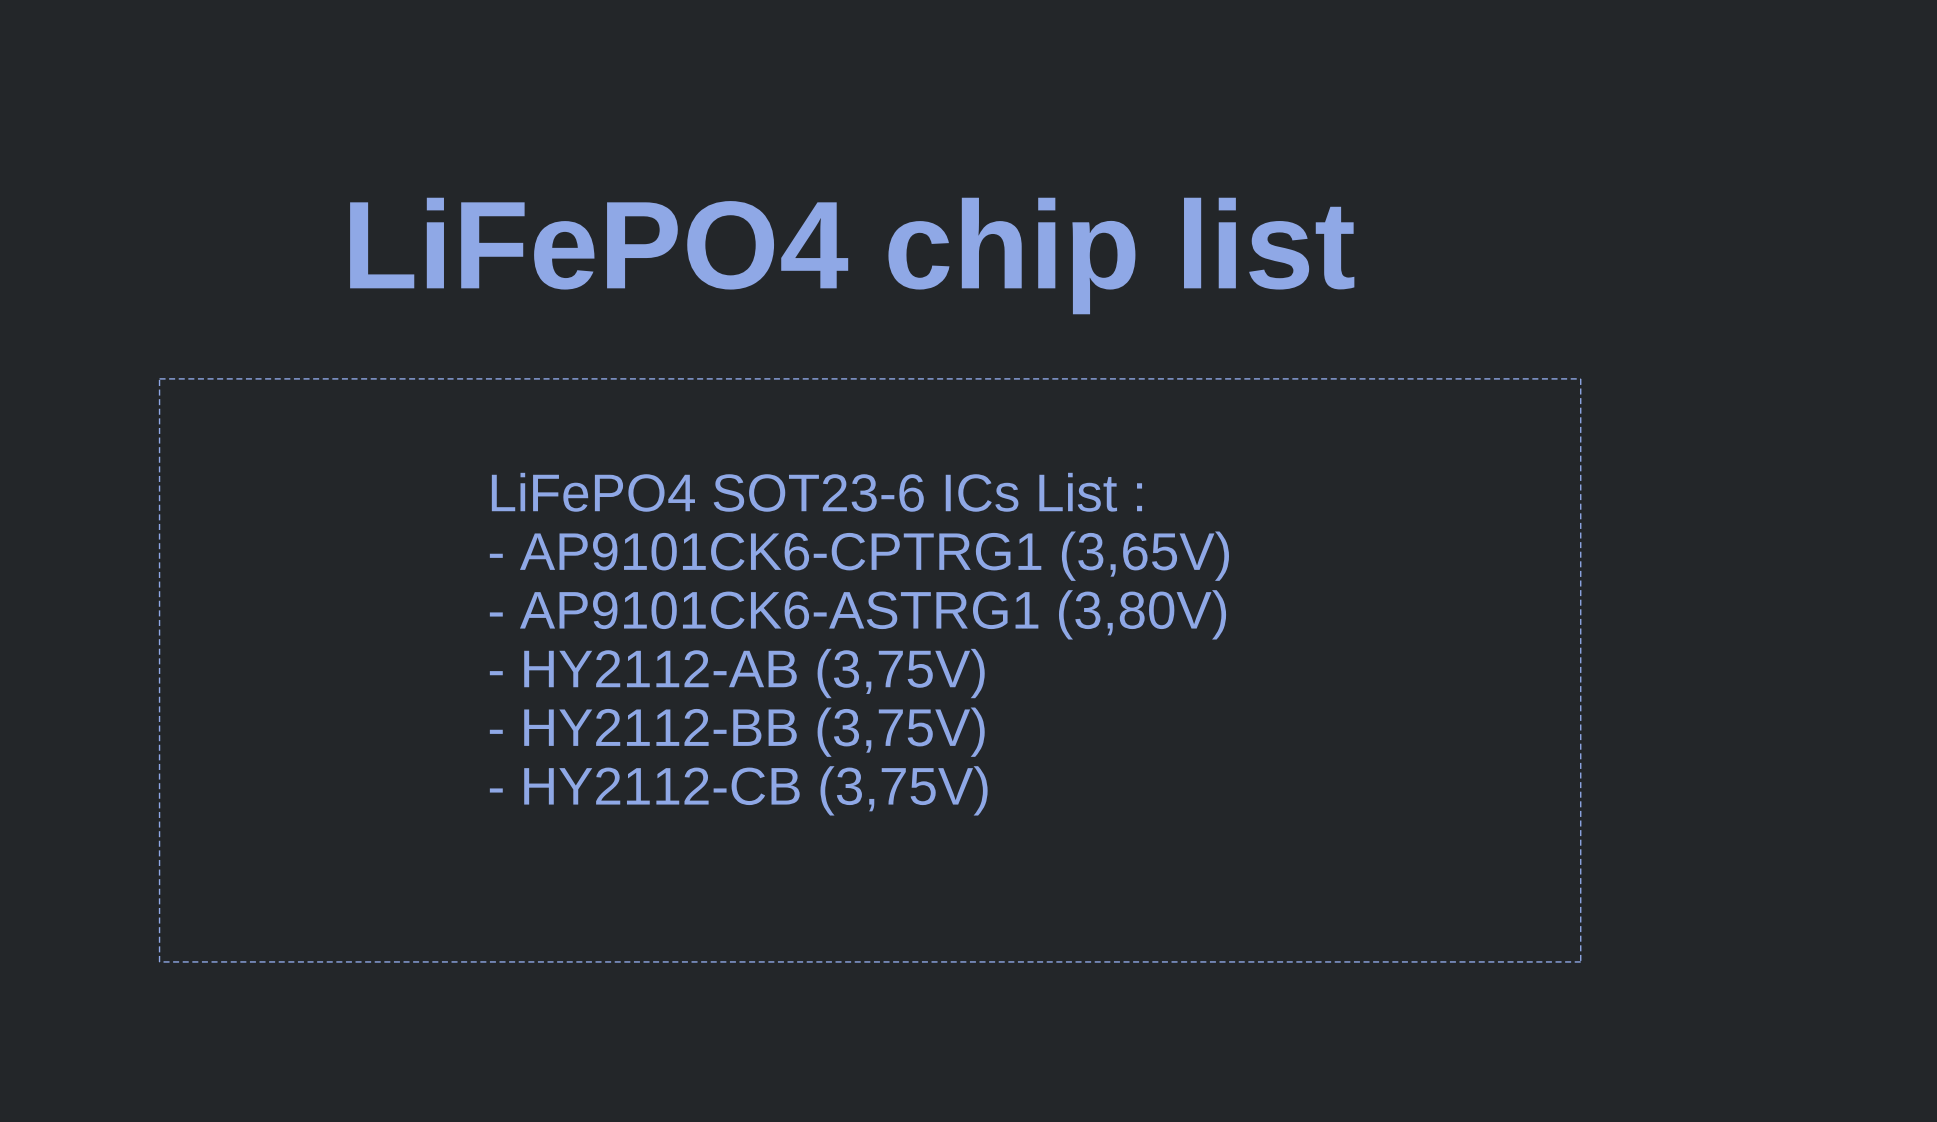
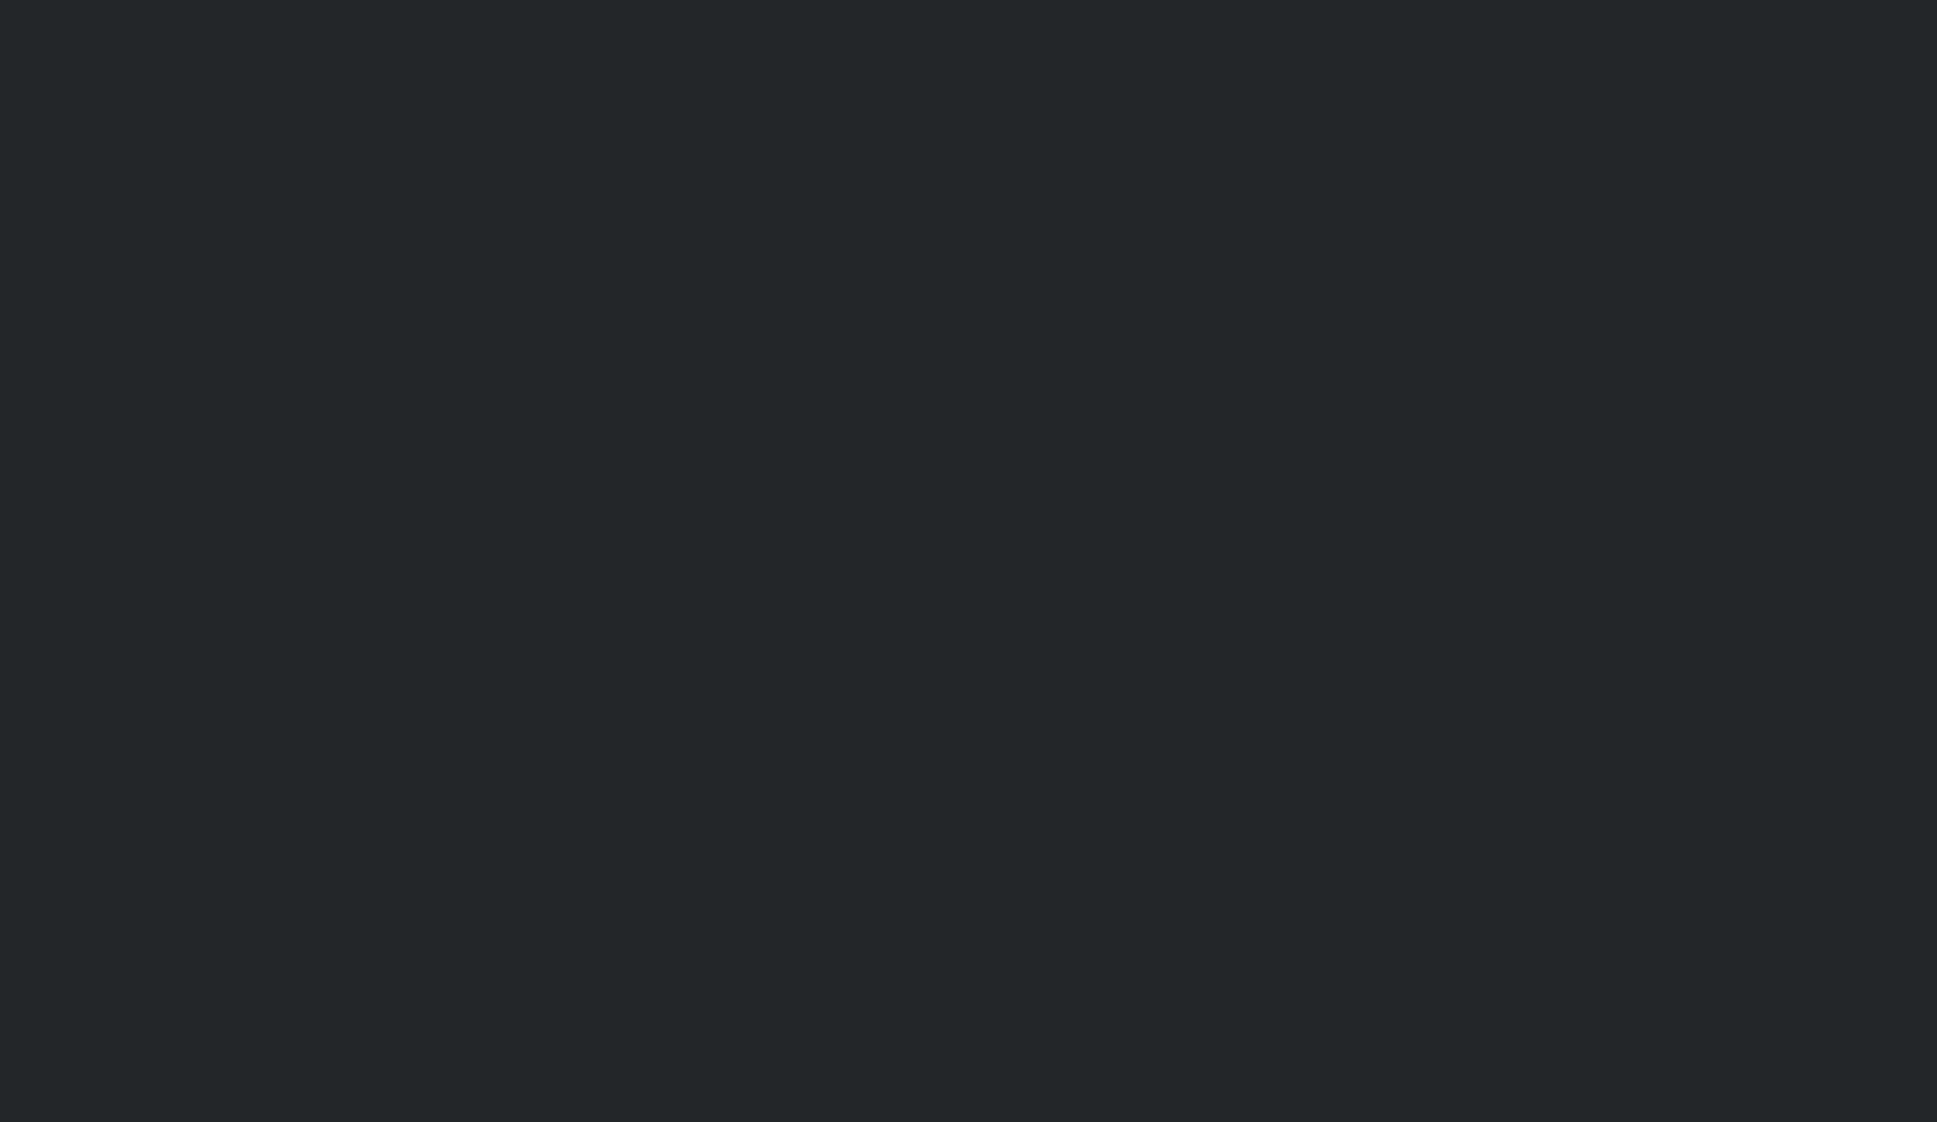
text: LiFePO4 chip list (852, 256) -> none
line: (159, 378) (1580, 378) (1580, 961) (159, 961) (159, 378) -> none
text: LiFePO4 SOT23-6 ICs List : (816, 492) -> none
text: - AP9101CK6-CPTRG1 (3,65V) (859, 556) -> none
text: - AP9101CK6-ASTRG1 (3,80V) (857, 614) -> none
text: - HY2112-AB (3,75V) (737, 673) -> none
text: - HY2112-BB (3,75V) (737, 732) -> none
text: - HY2112-CB (3,75V) (738, 790) -> none

